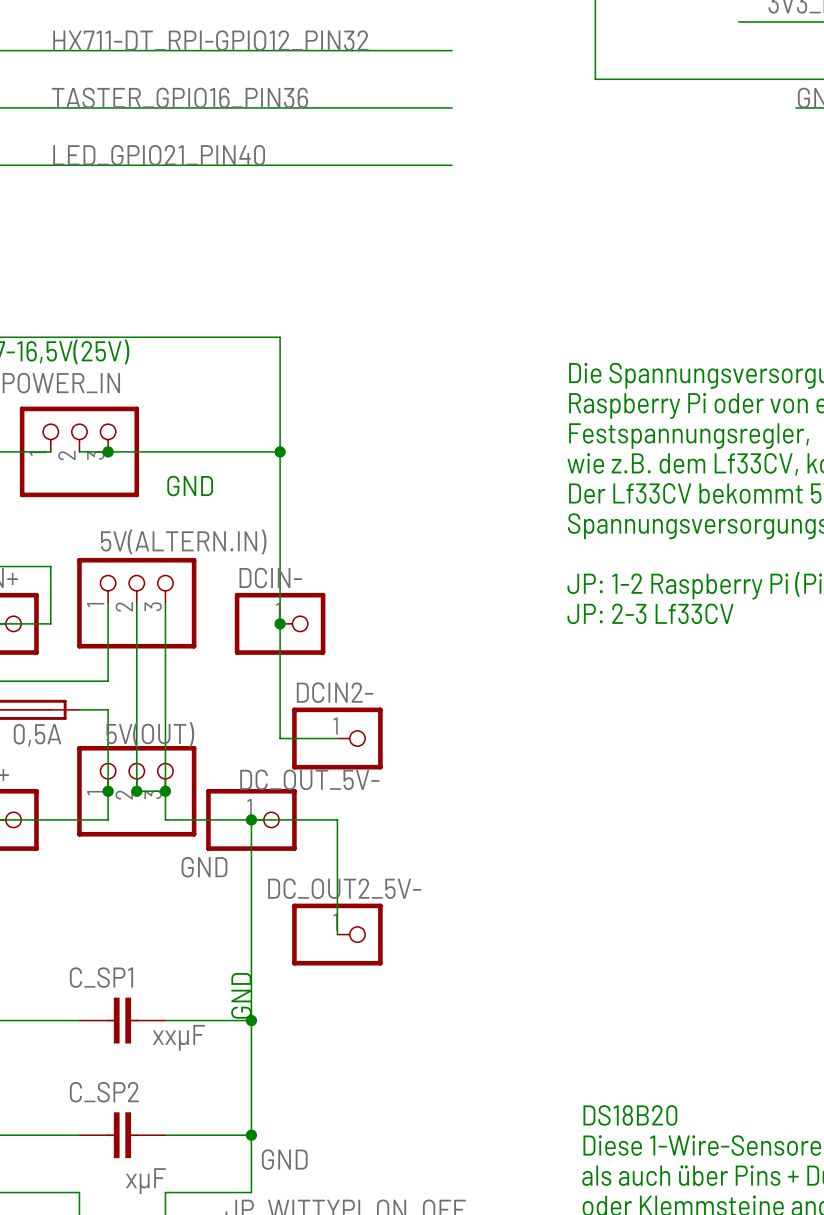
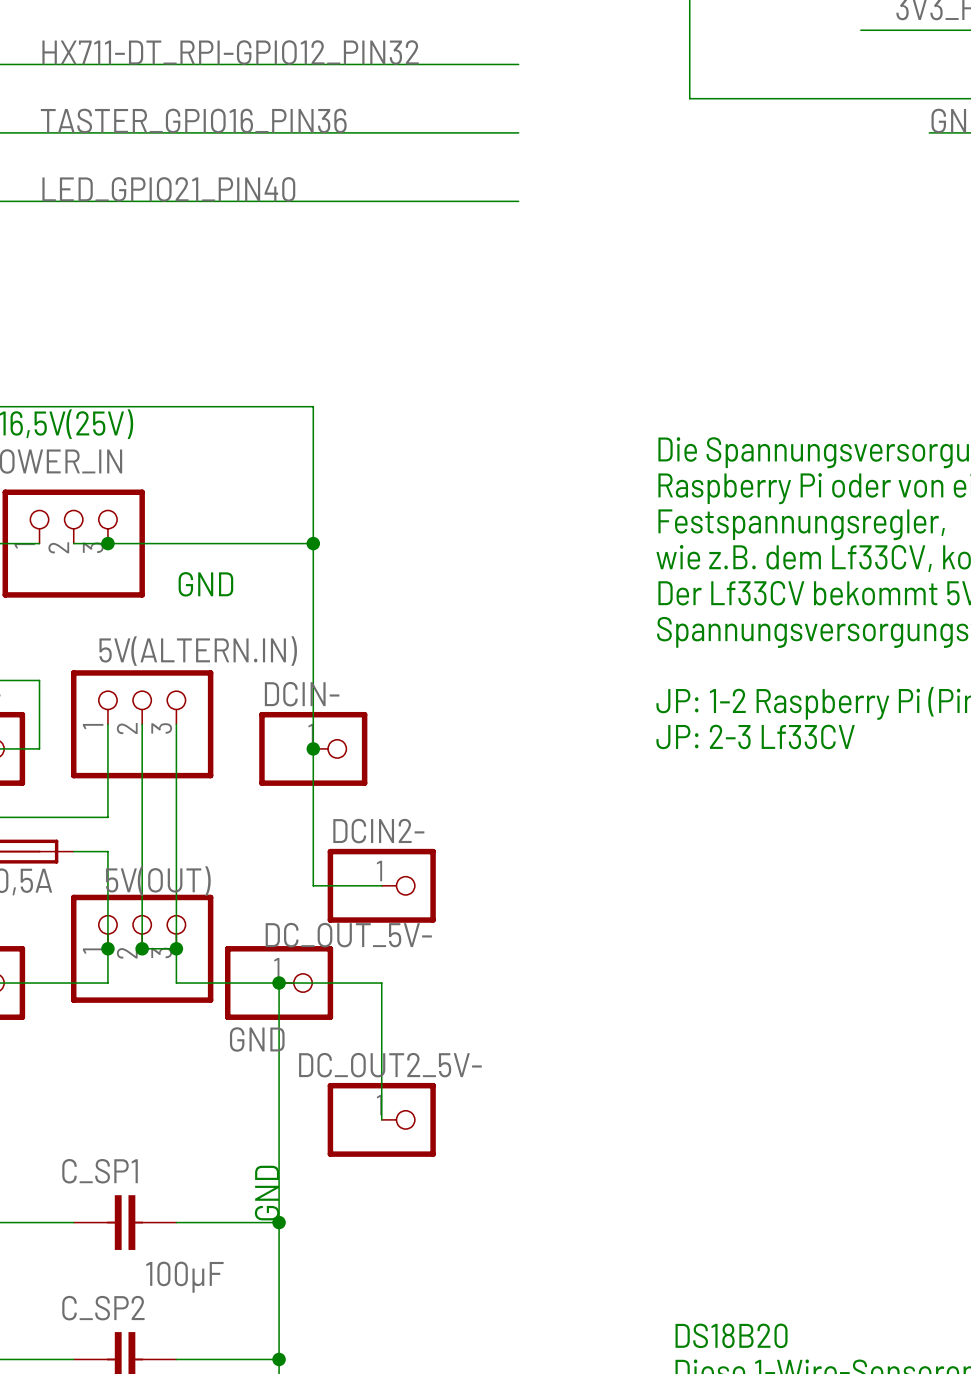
DC_OUT_5V- value position: GND (204, 867) -> GND (257, 1039)
C_SP1 value: xxµF (178, 1037) -> 100µF (184, 1277)

